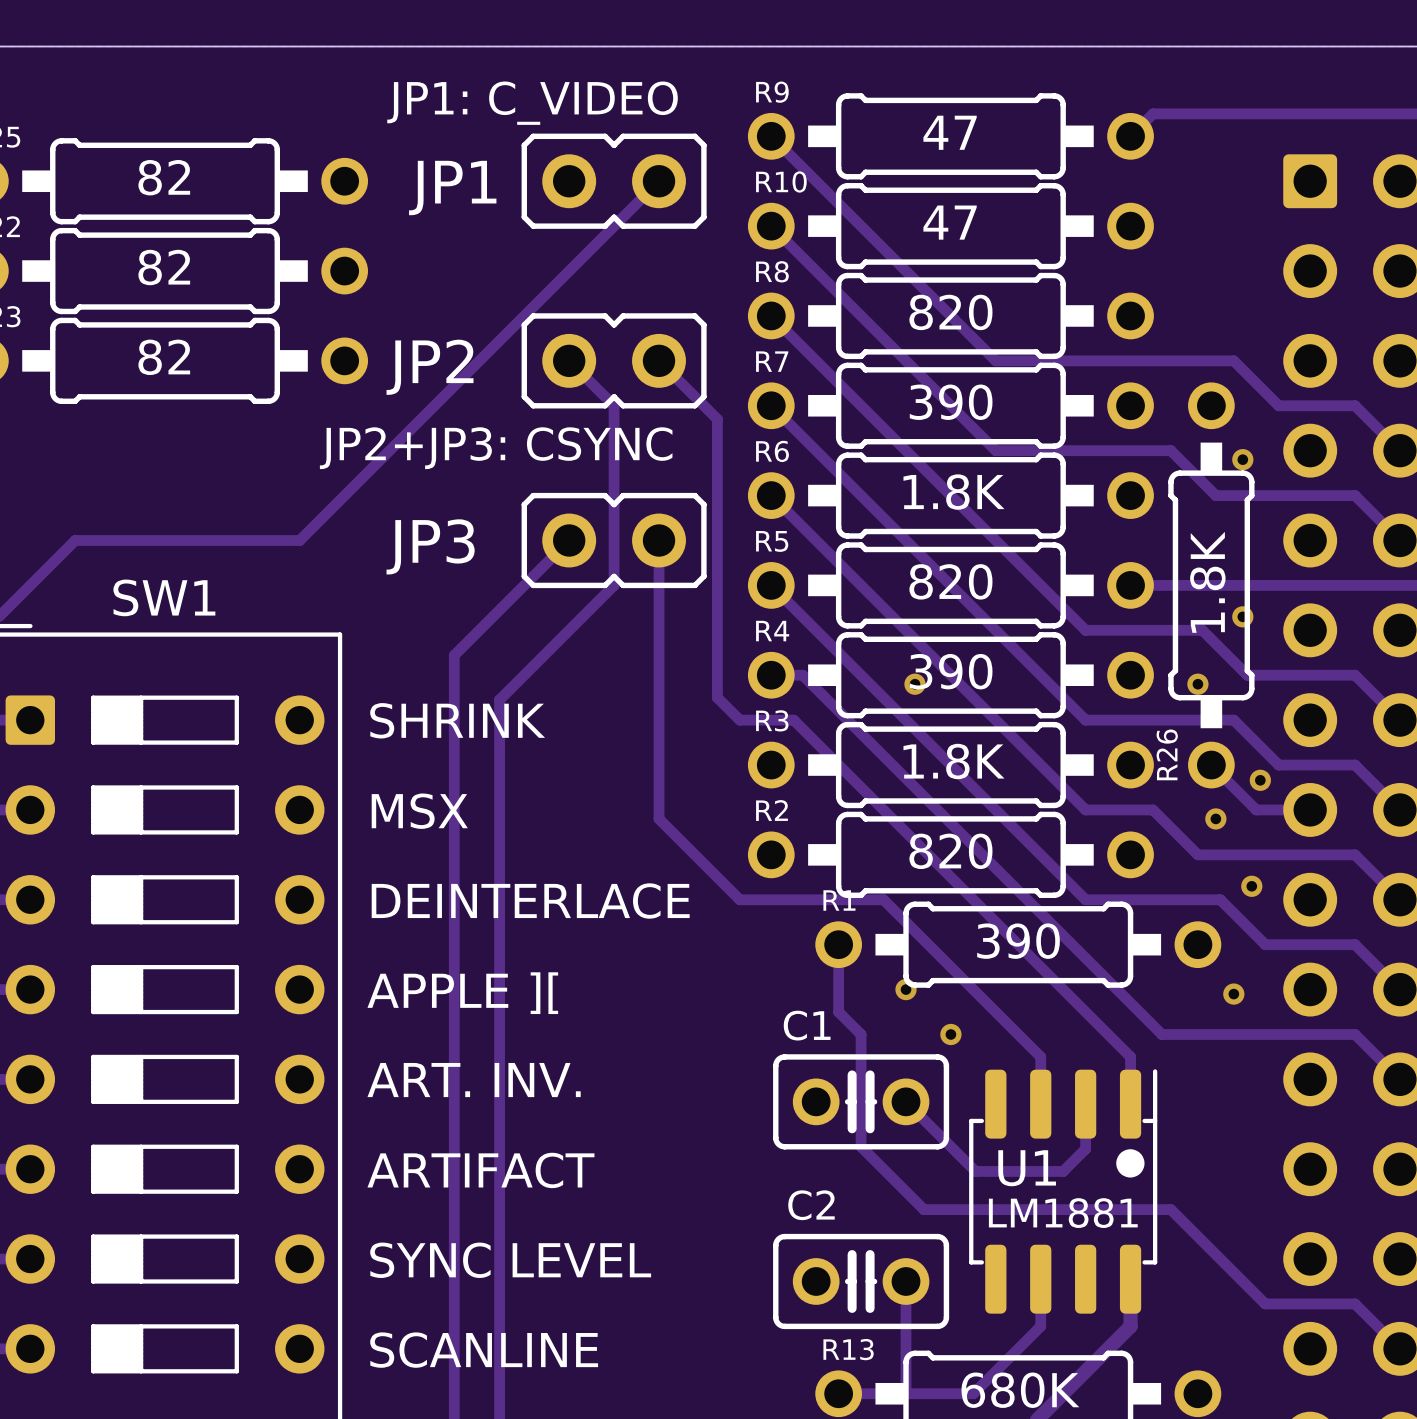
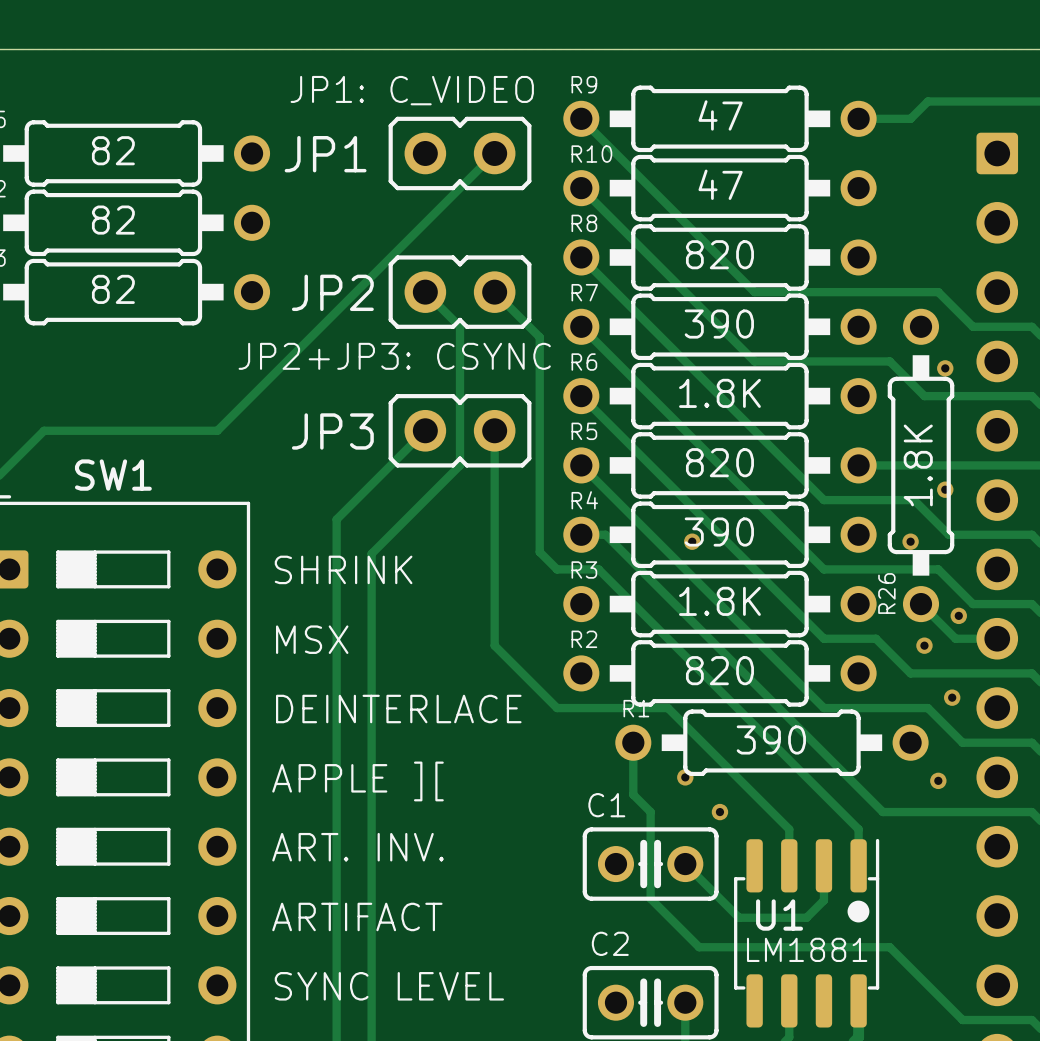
track: (1220, 113) (1153, 113) (1130, 136) -> (927, 101) (910, 118) (858, 118)

